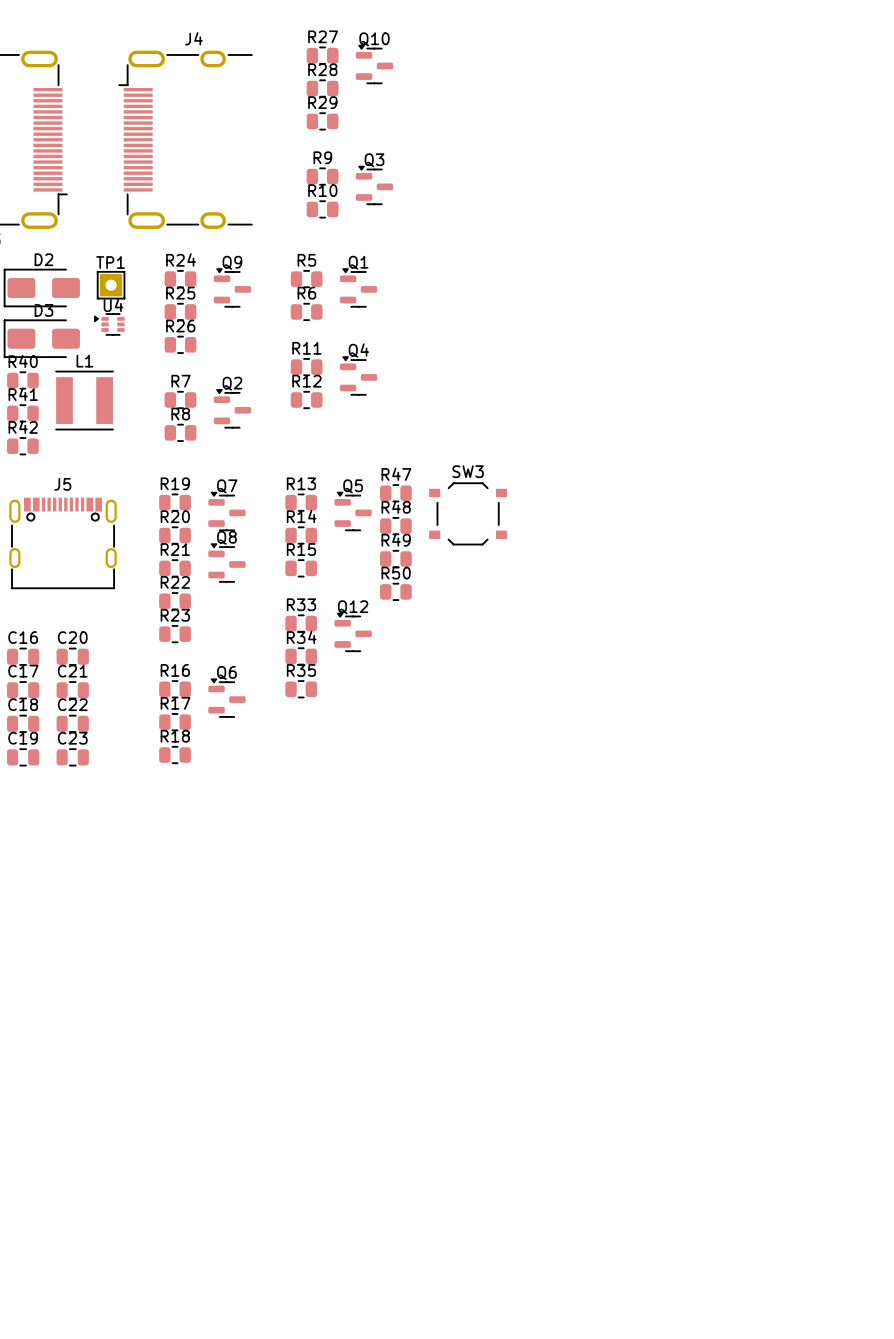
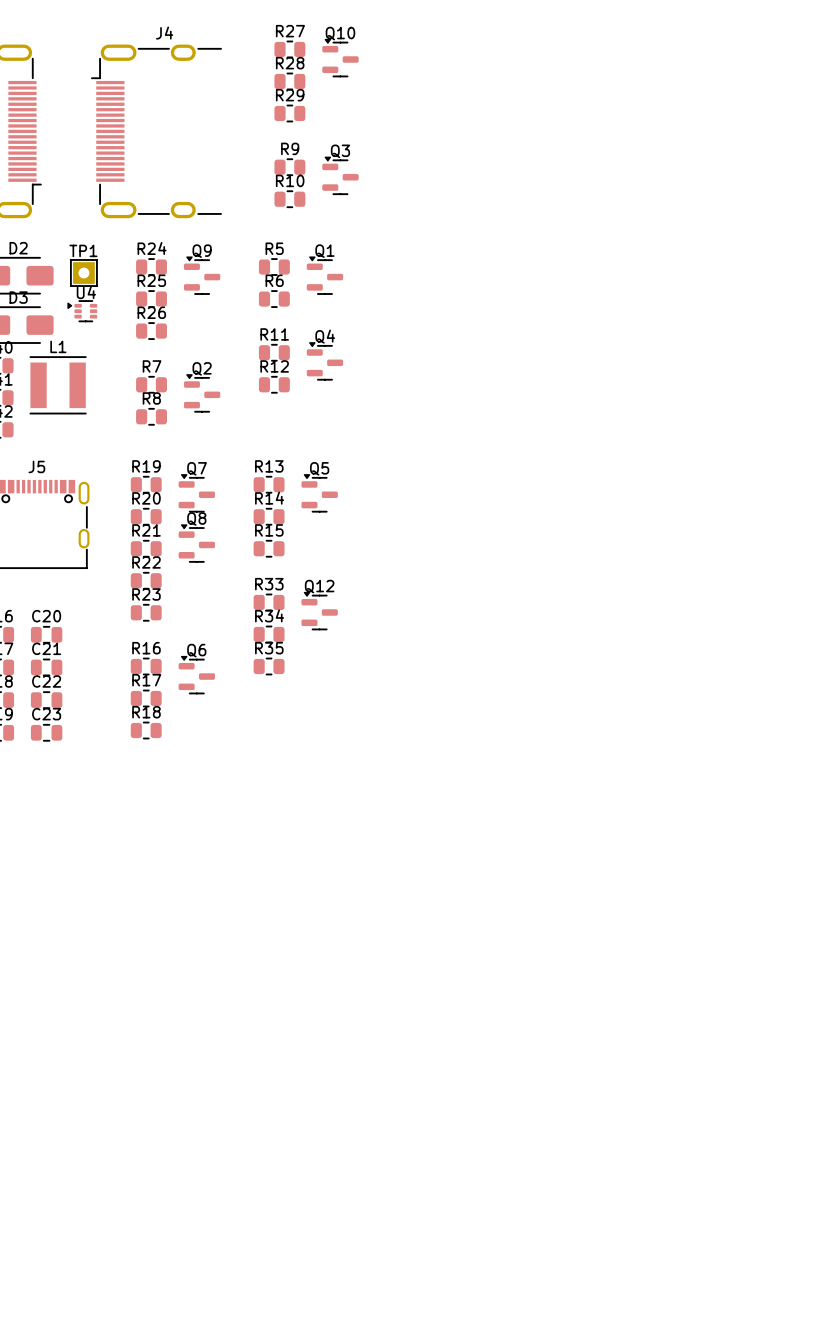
R47: (395, 493) -> none
SW3: (468, 513) -> none
R48: (395, 526) -> none
R49: (395, 559) -> none
R50: (395, 591) -> none

